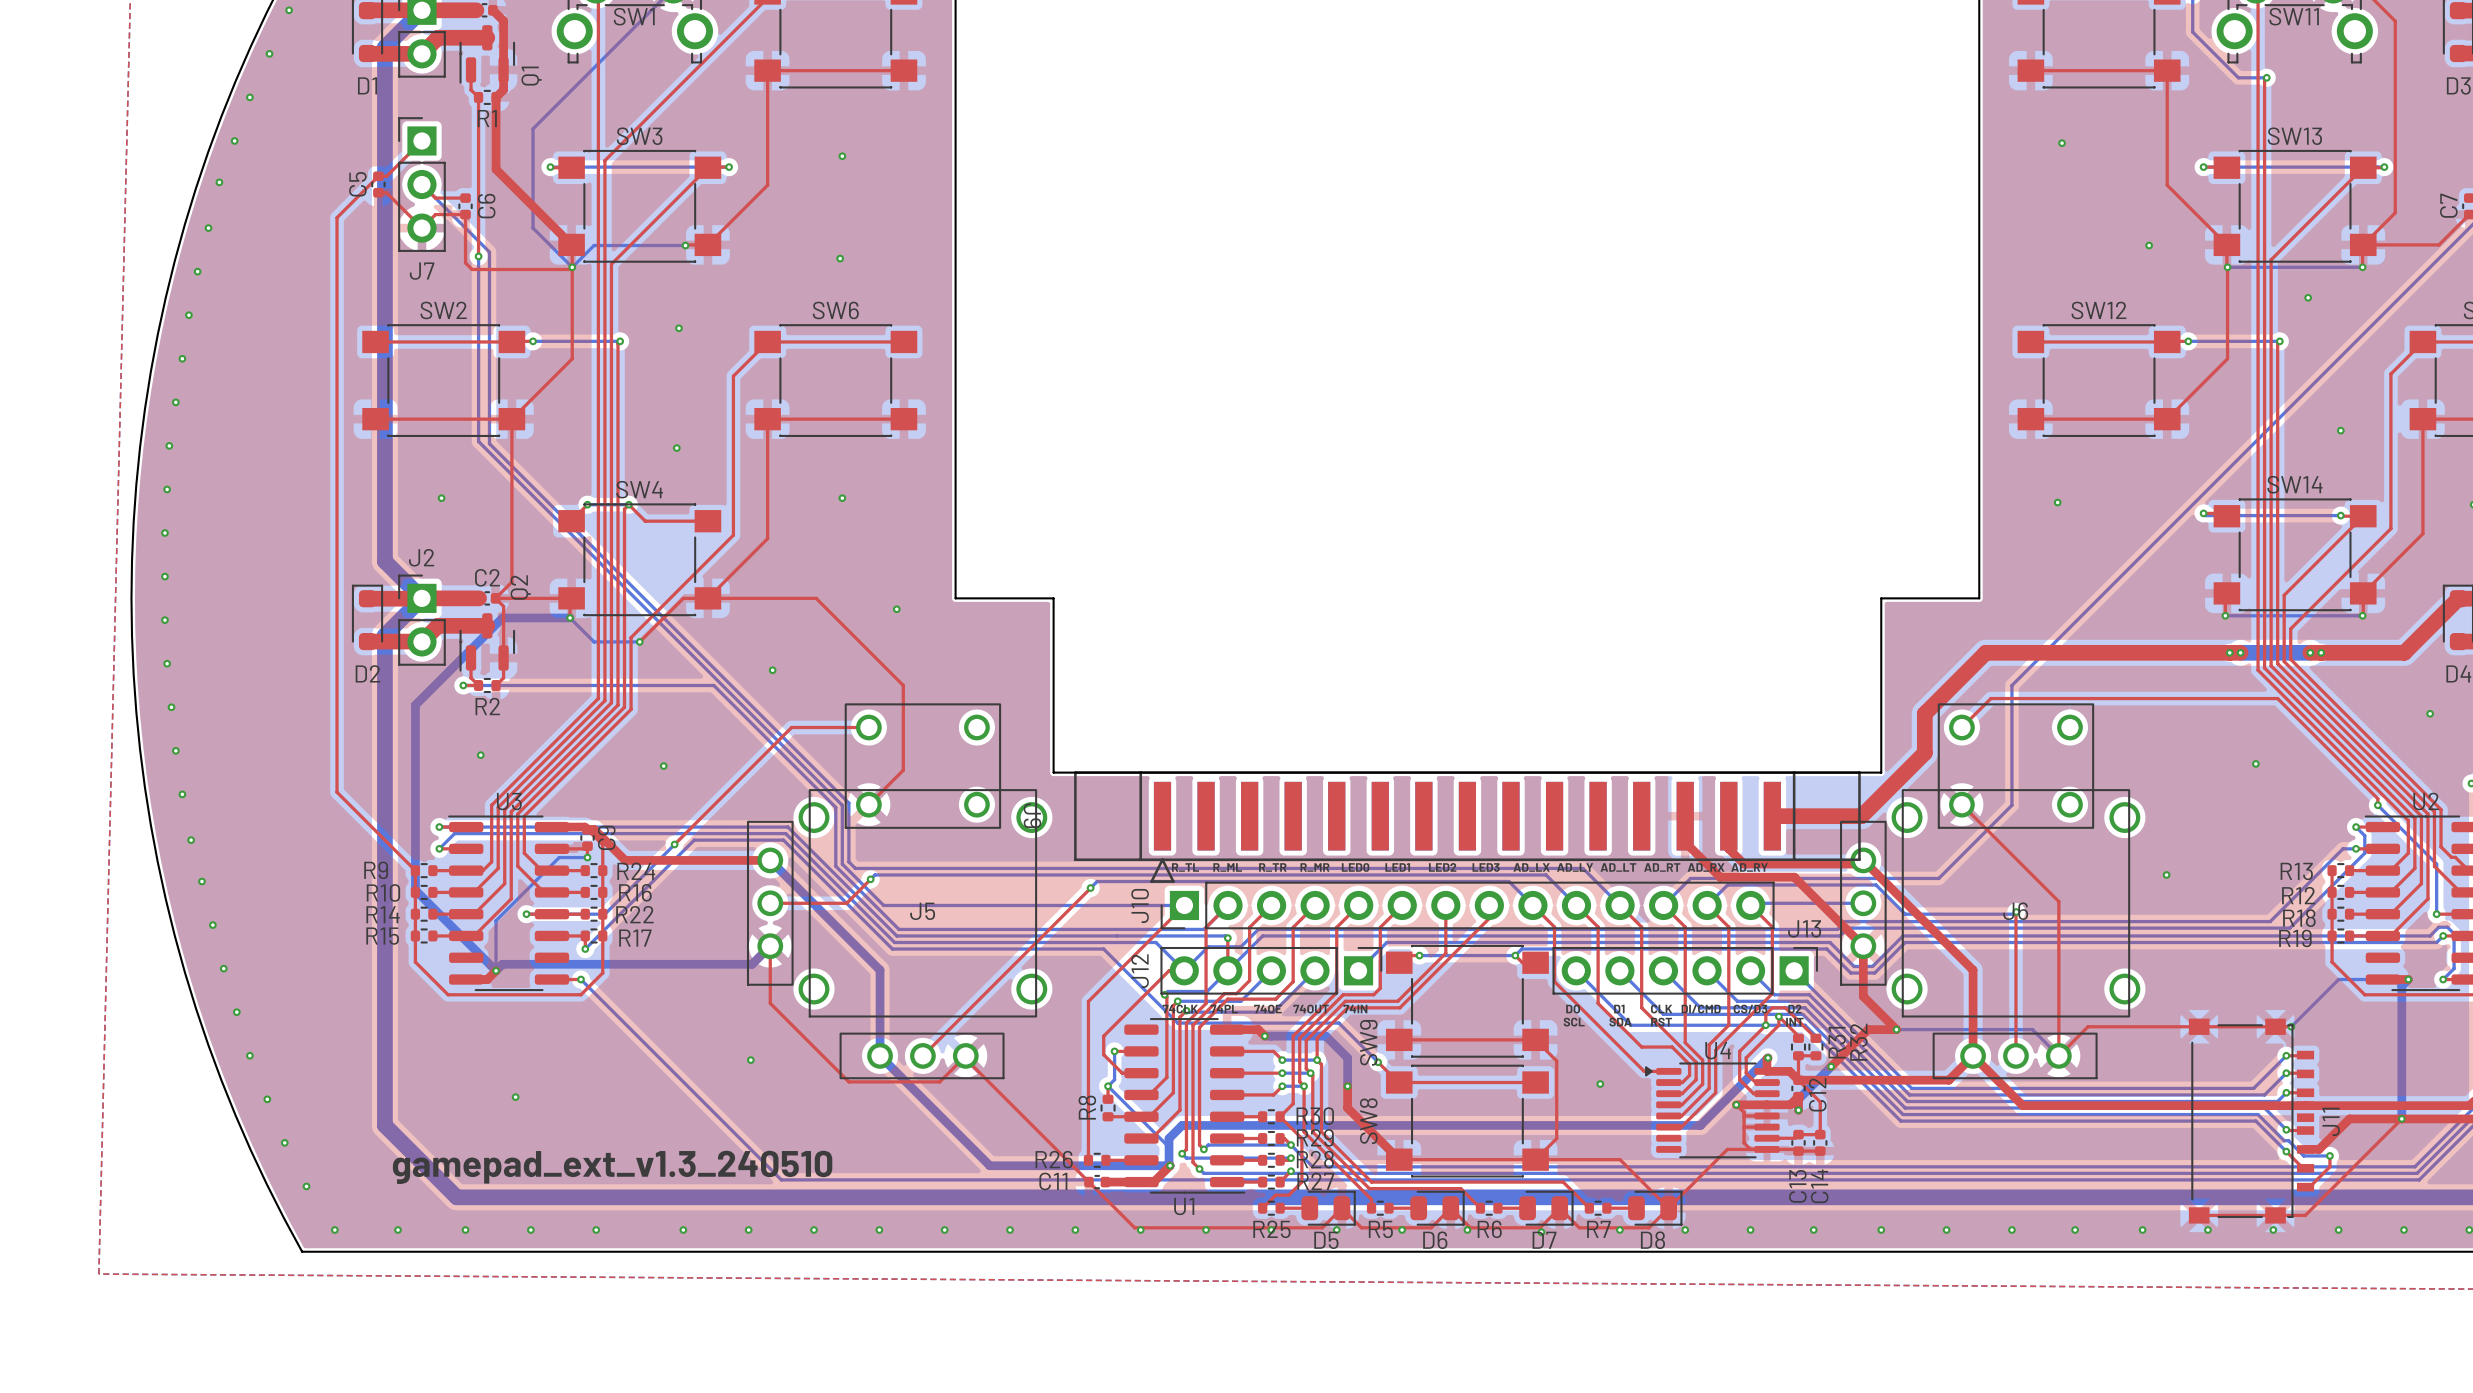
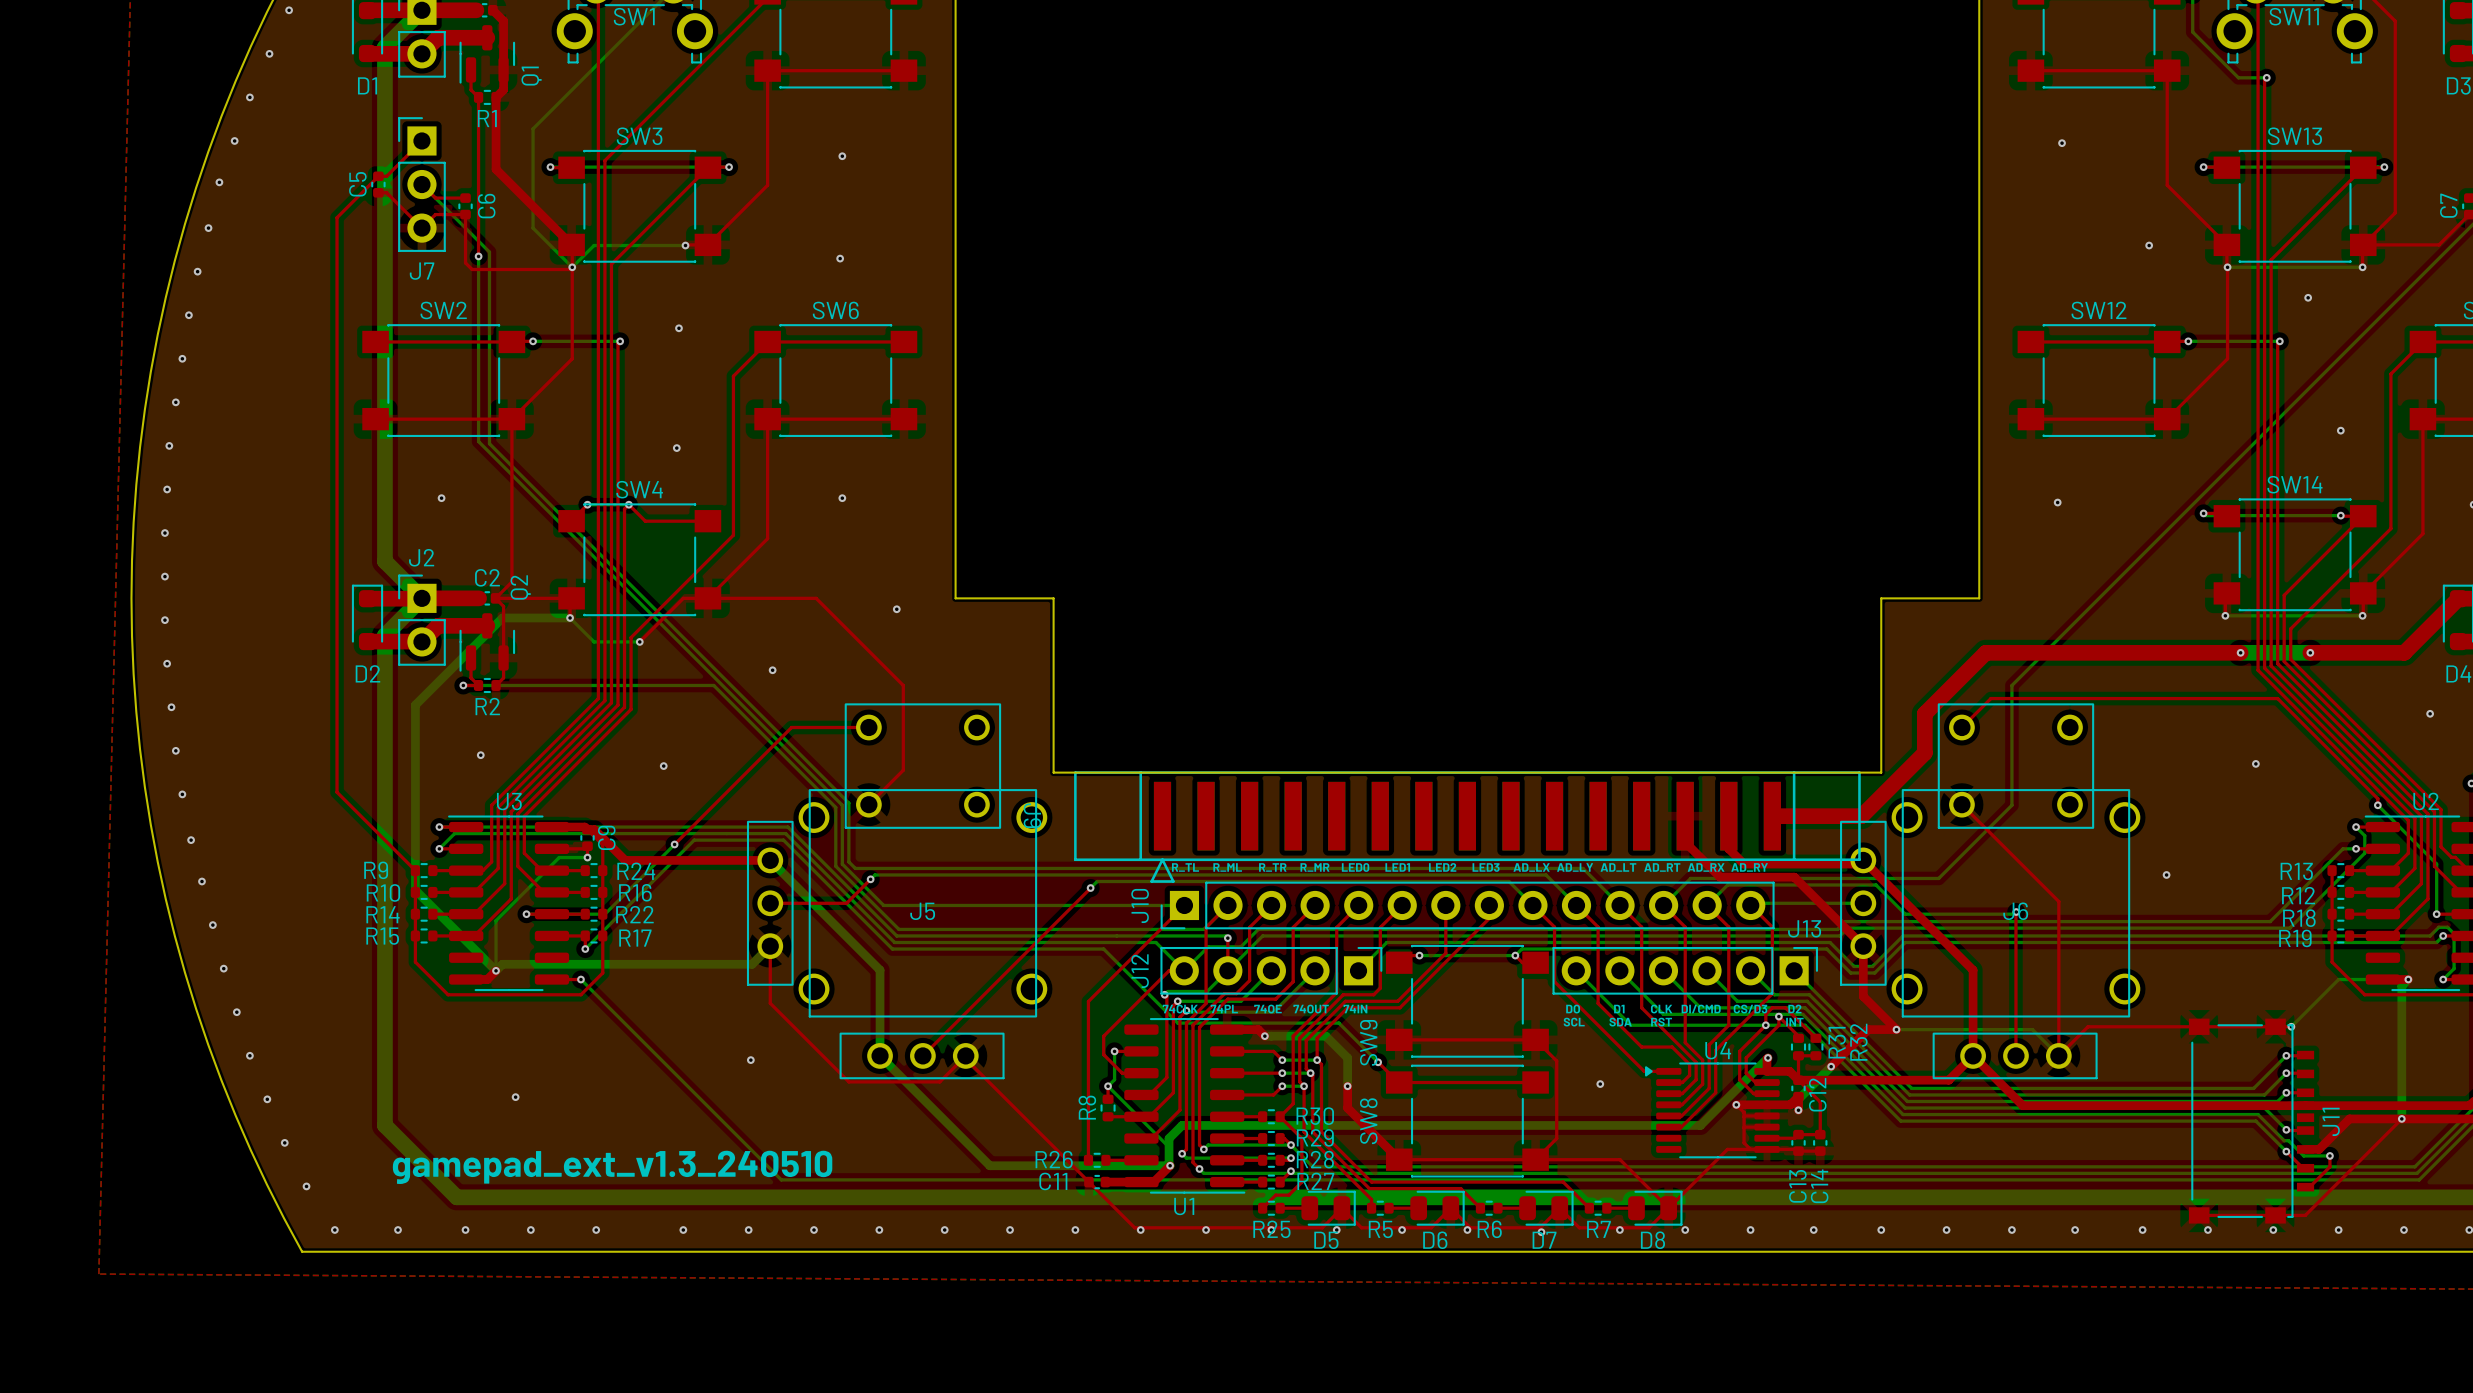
via: (2229, 652) -> none
via: (2321, 652) -> none

